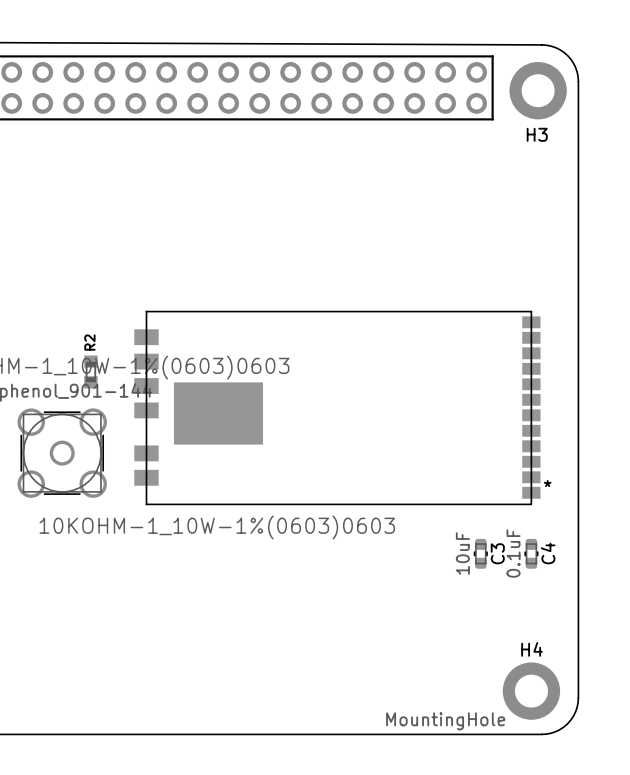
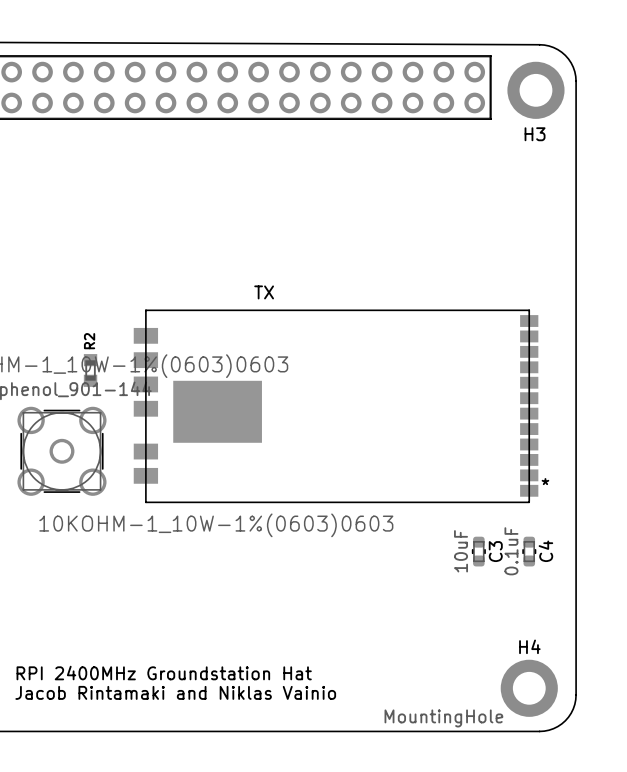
text: none -> TX (264, 292)
text: none -> RPI 2400MHz Groundstation Hat (164, 673)
text: none -> Jacob Rintamaki and Niklas Vainio (175, 692)

